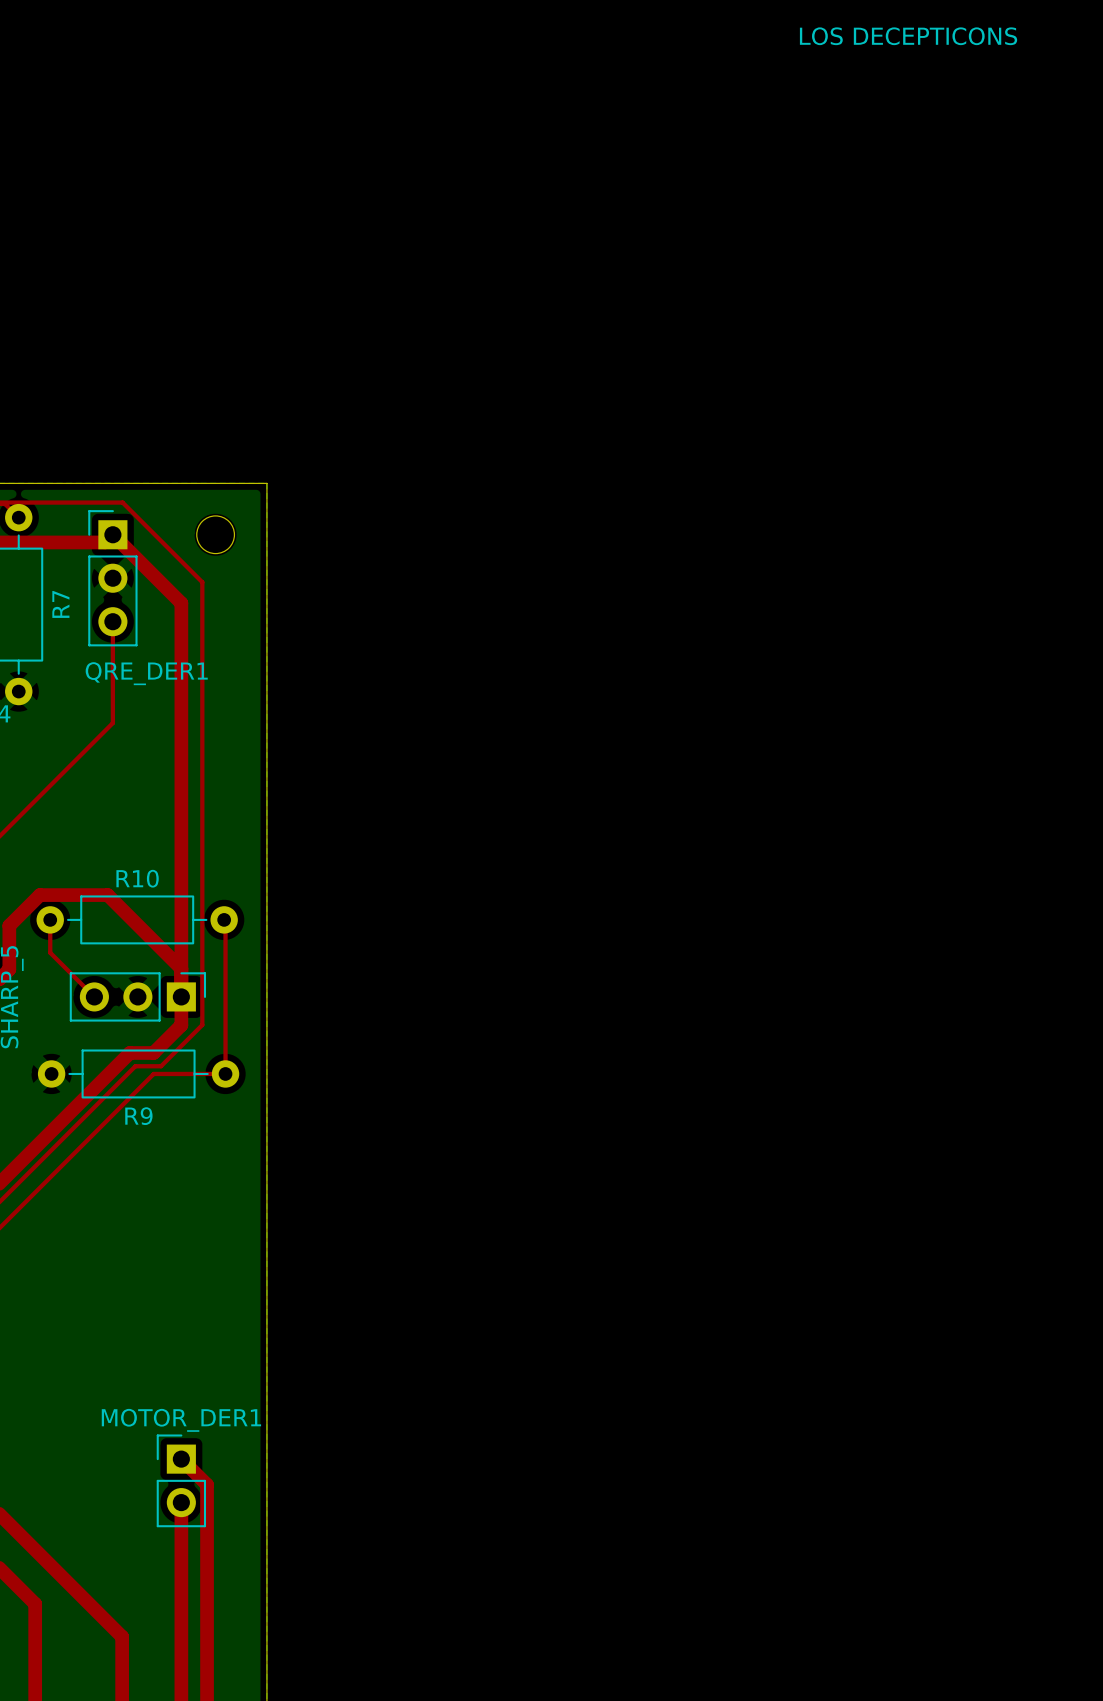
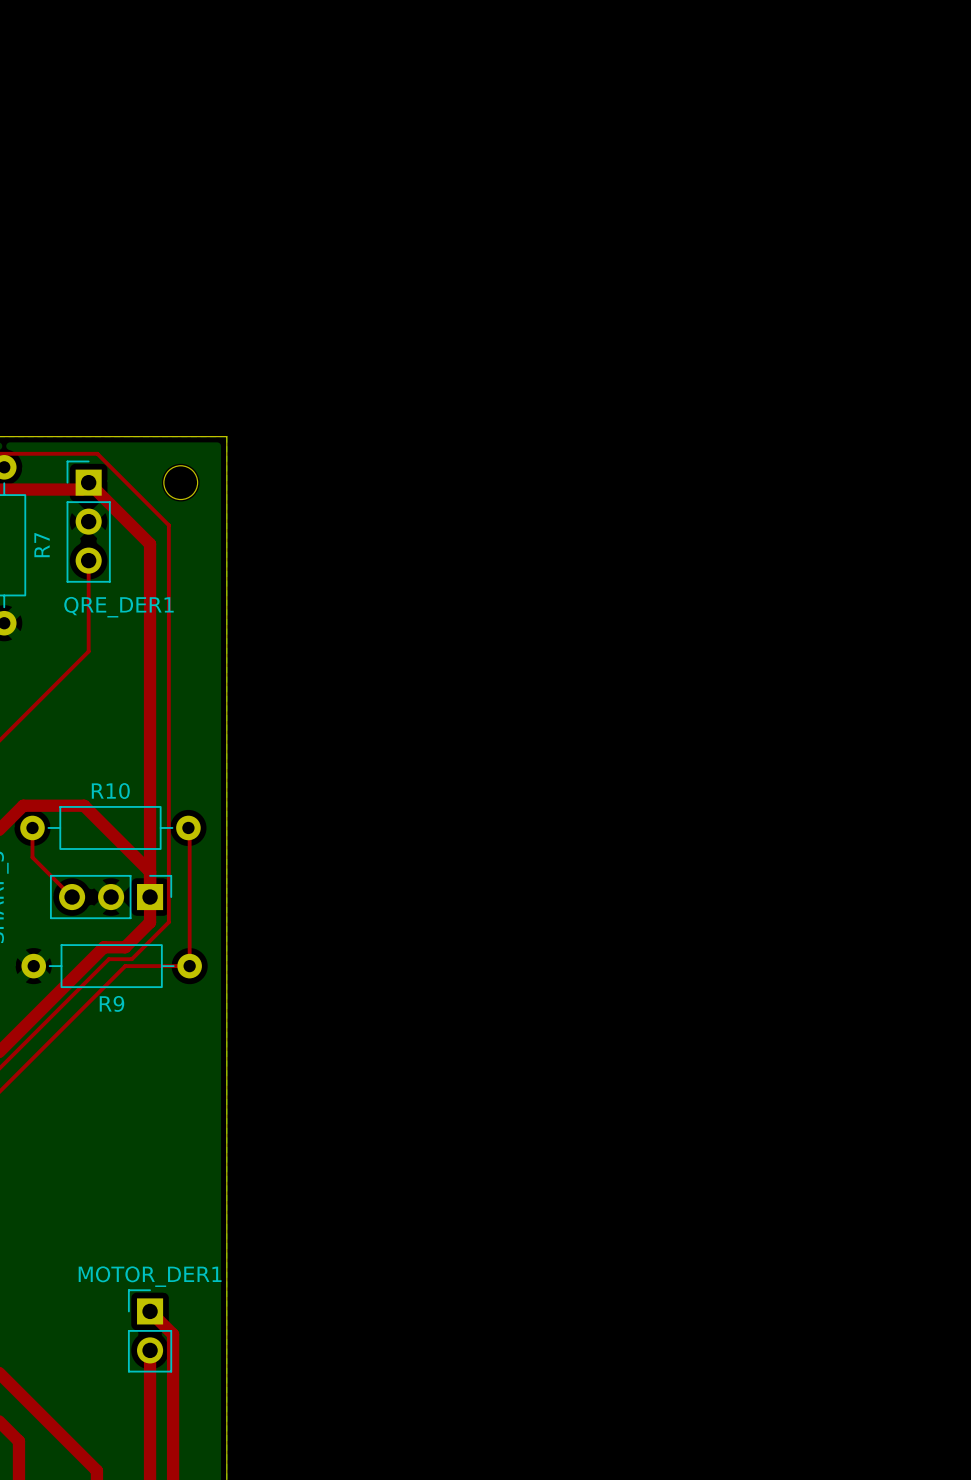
text: LOS DECEPTICONS (908, 36) -> none

